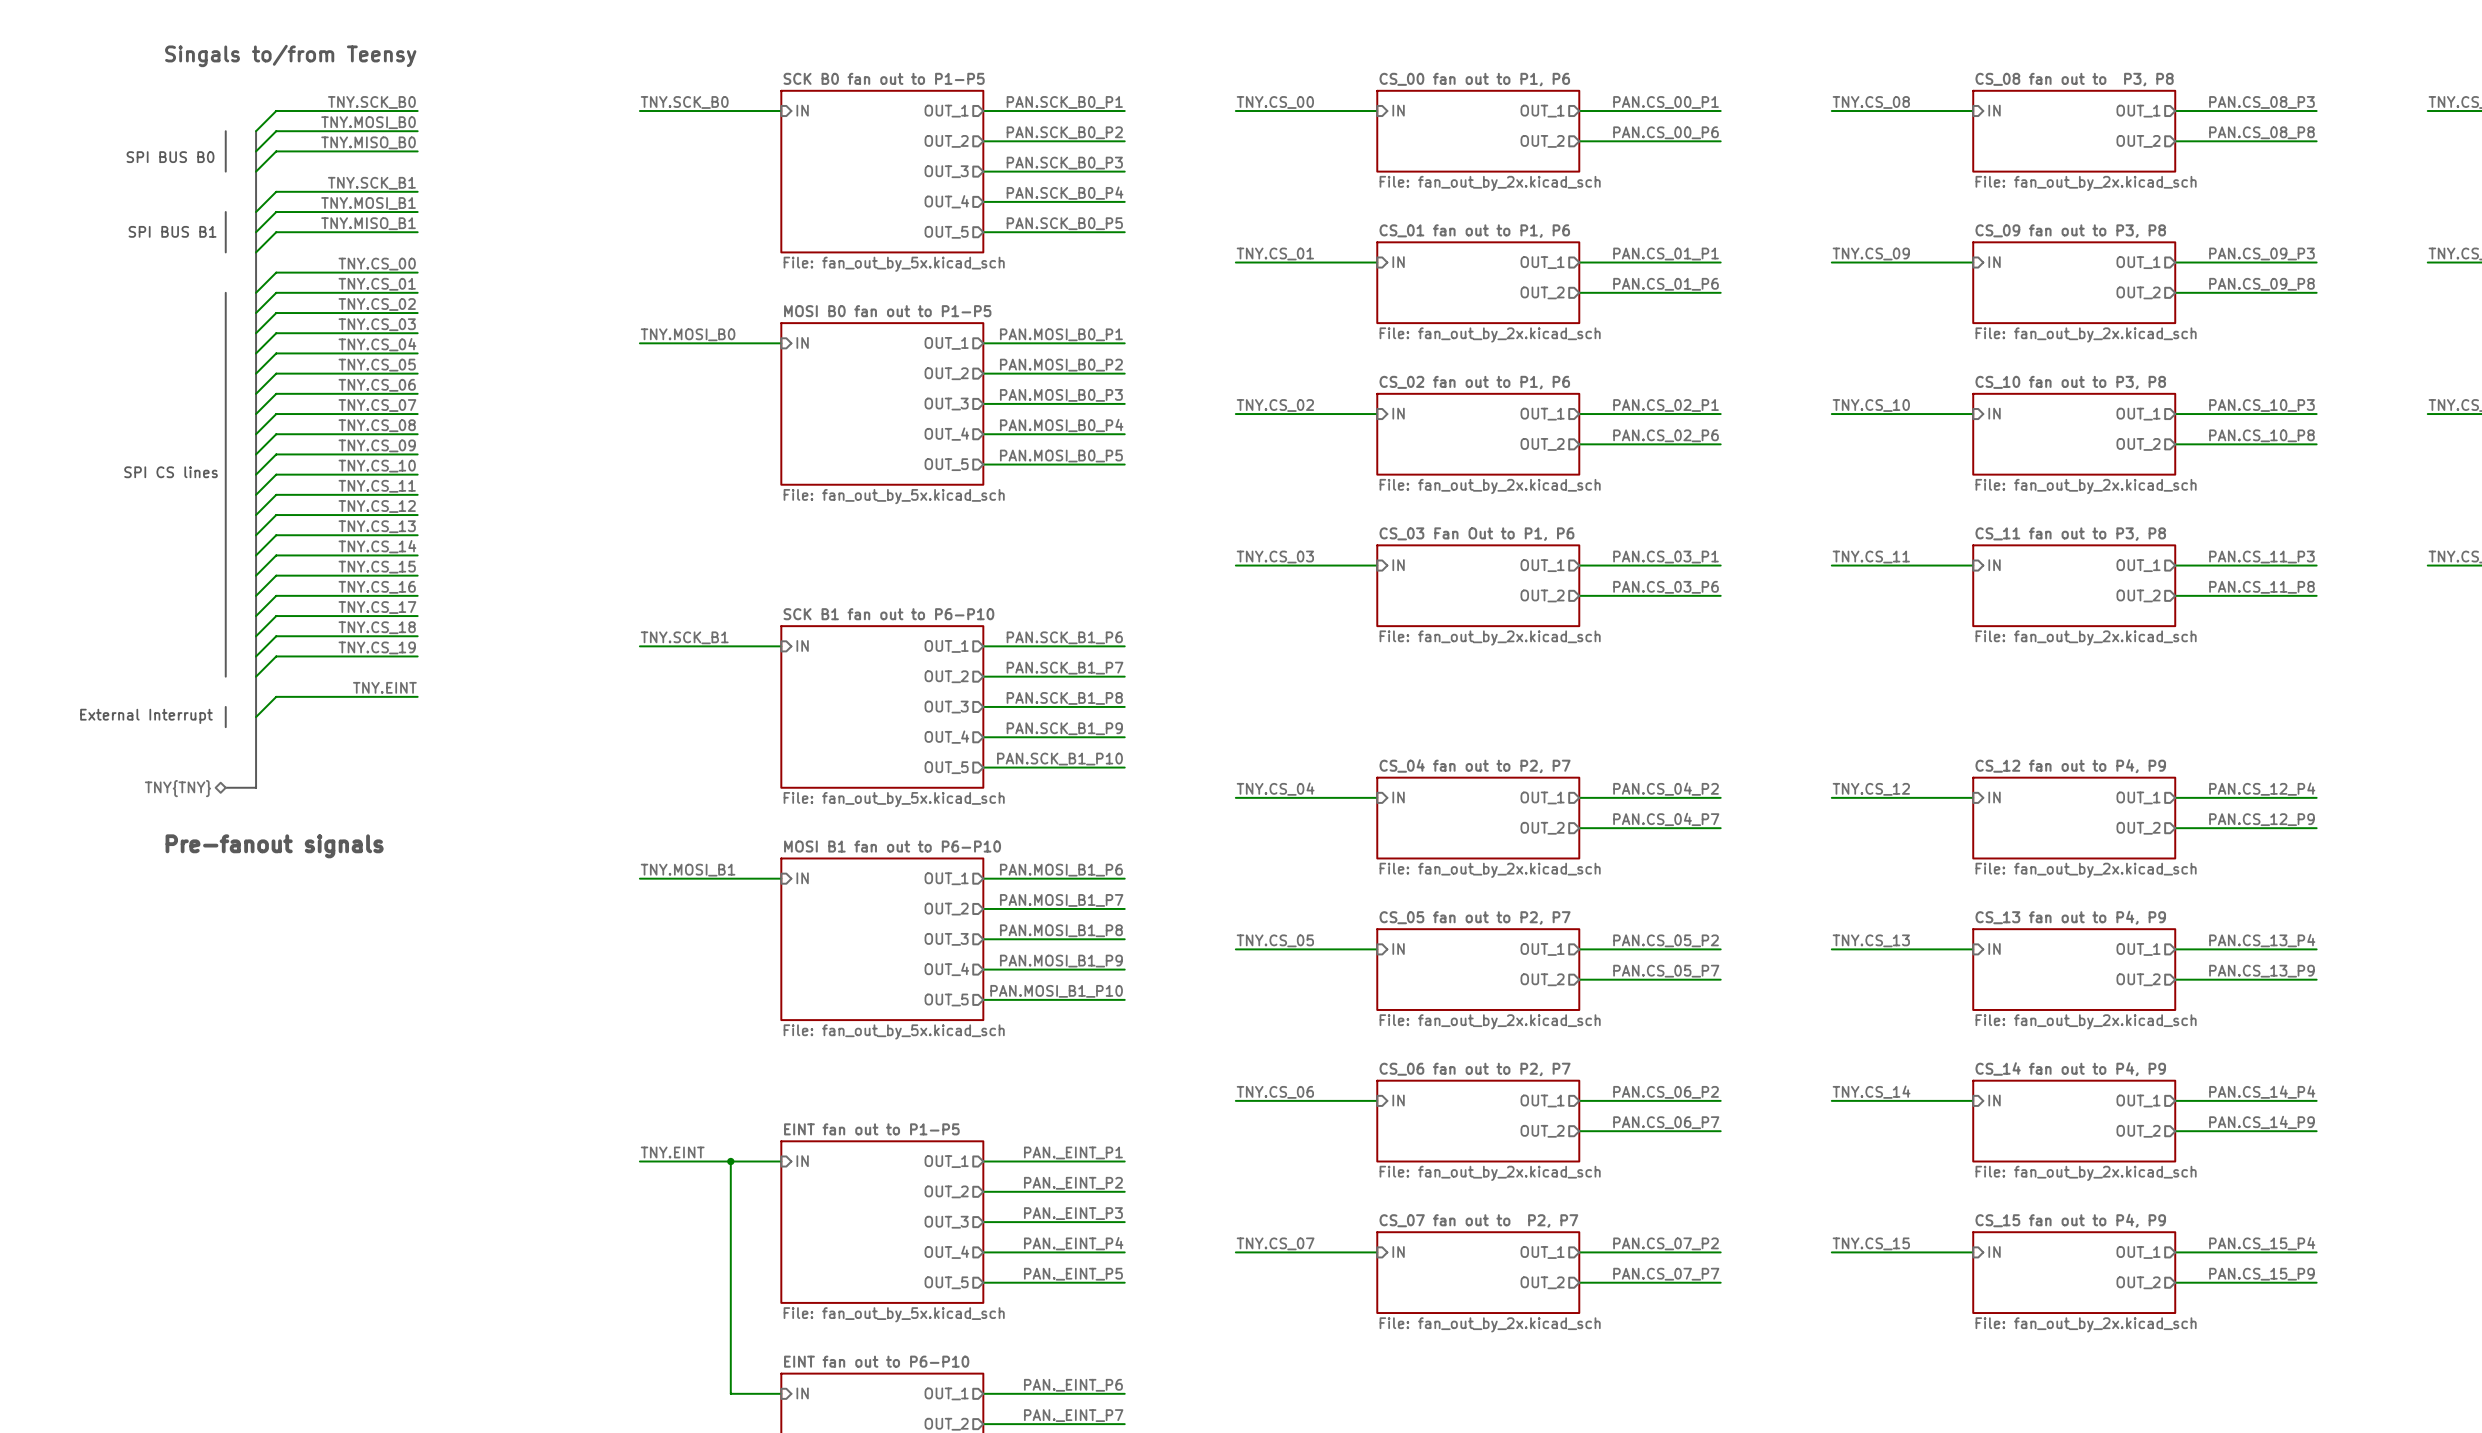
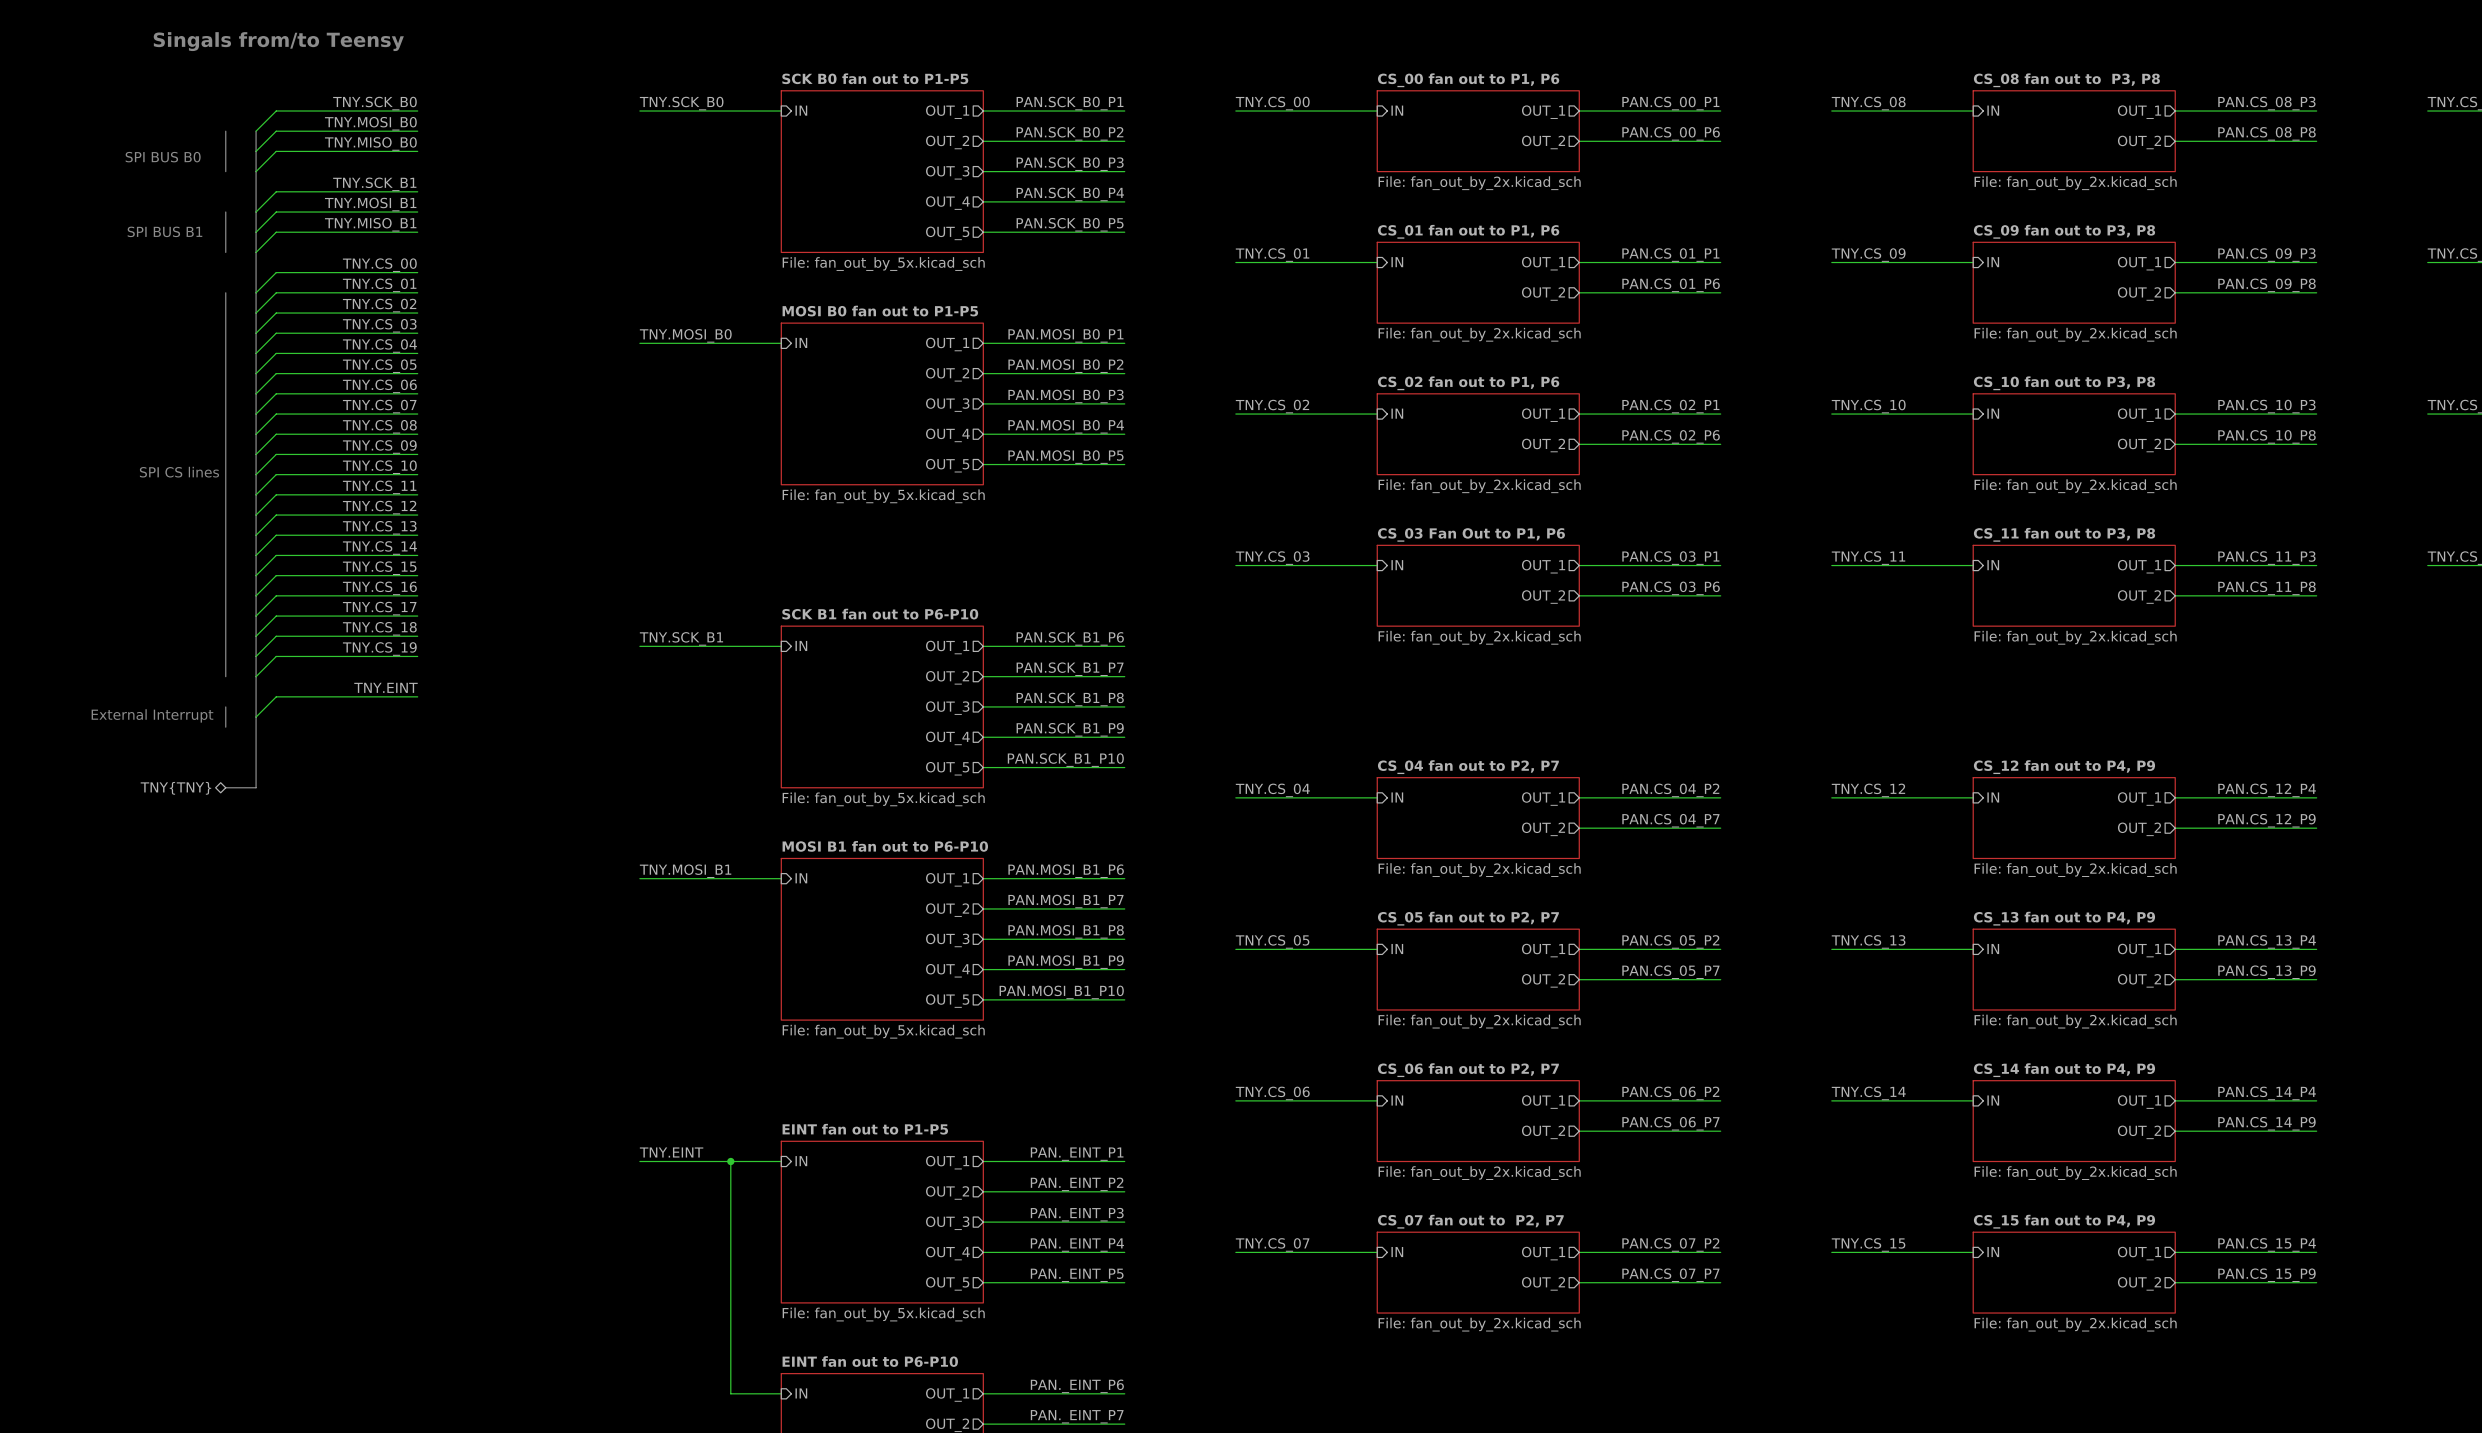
text: Singals to/from Teensy (290, 55) -> Singals from/to Teensy (278, 41)
text: Pre-fanout signals (274, 846) -> none

